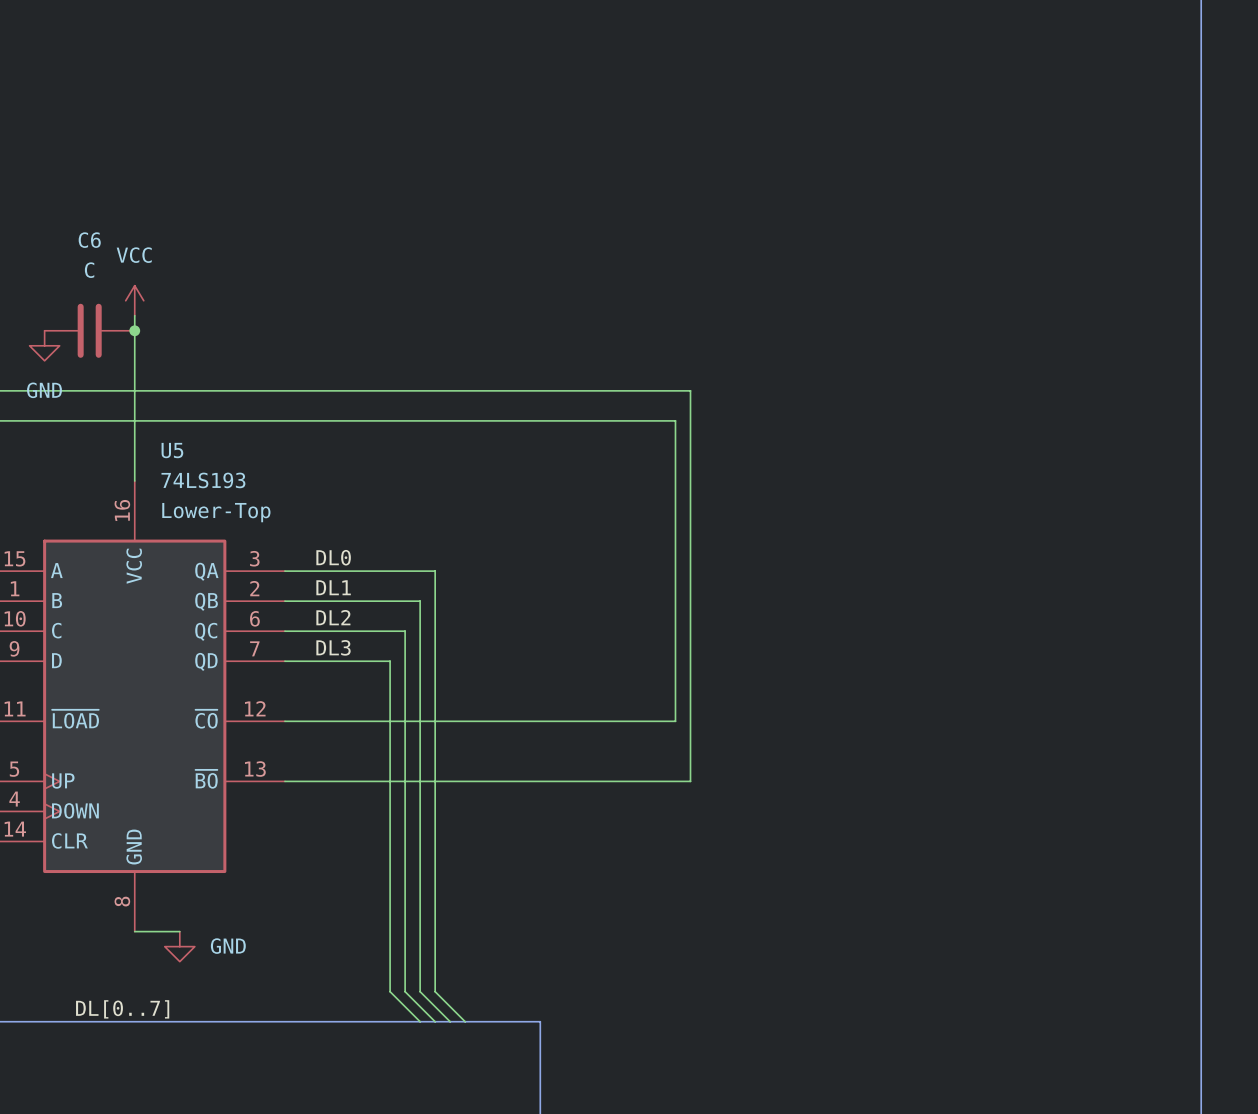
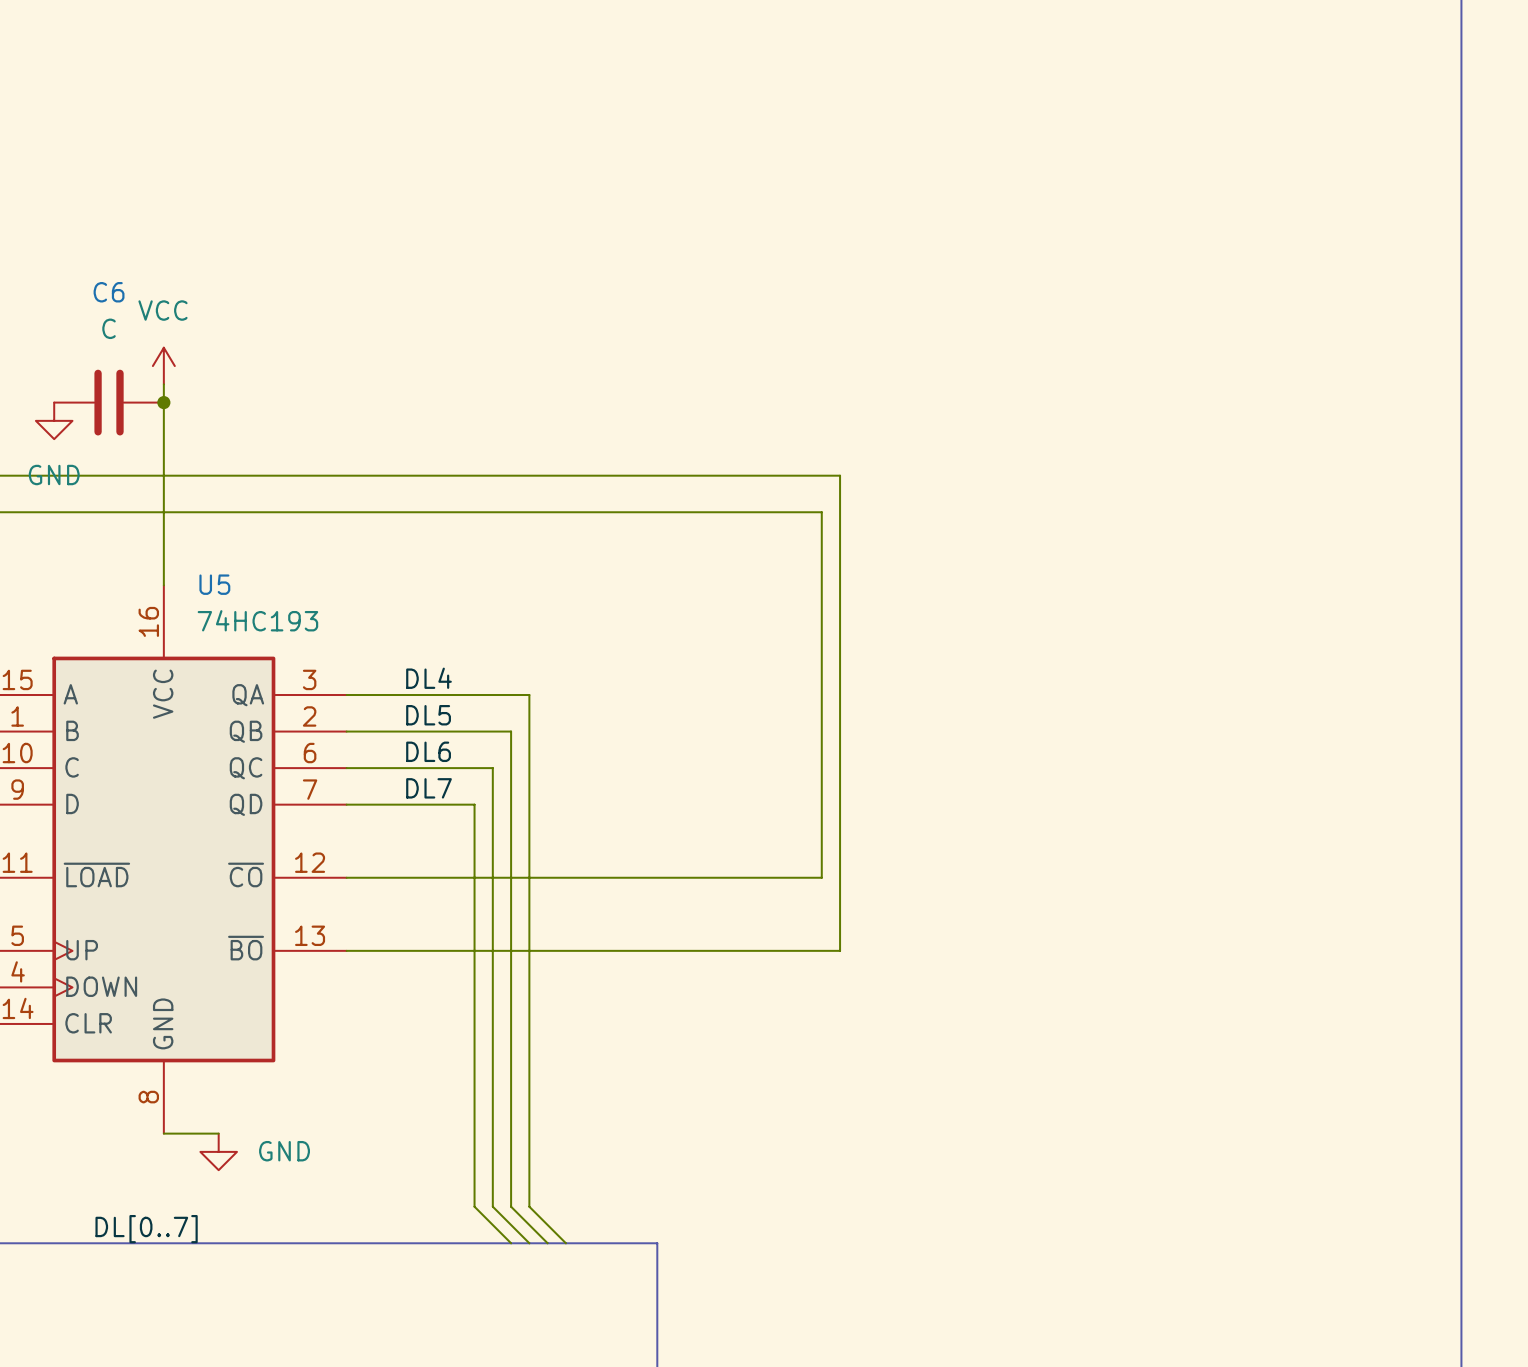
U5 name position: U5 (172, 450) -> U5 (214, 584)
U5 value: 74LS193 (203, 480) -> 74HC193 (257, 620)
U5 text: Lower-Top (216, 512) -> none
label: DL0 (333, 557) -> DL4 (428, 678)
label: DL1 (333, 587) -> DL5 (428, 715)
label: DL2 (333, 617) -> DL6 (428, 751)
label: DL3 (333, 647) -> DL7 (428, 788)

